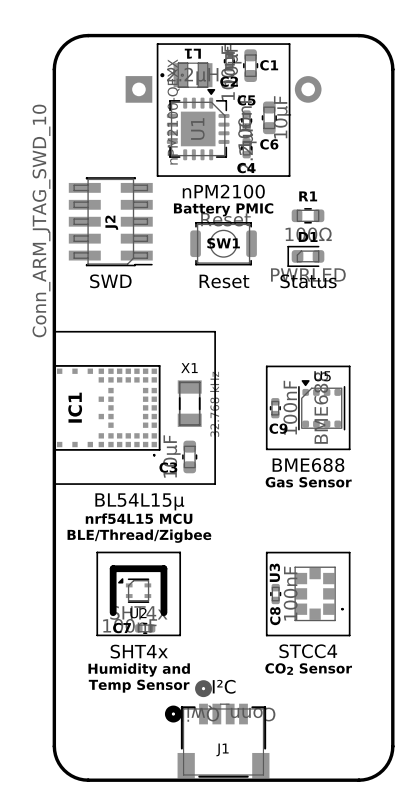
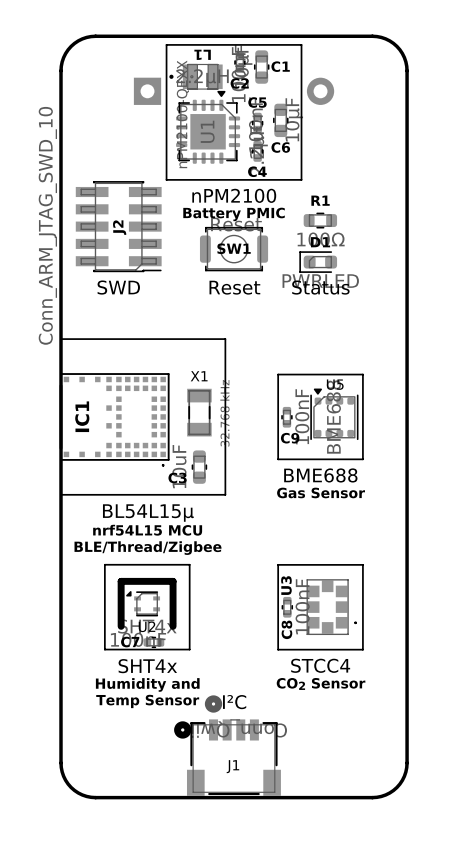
C3 value: 10μF (171, 456) -> 10uF (179, 466)

